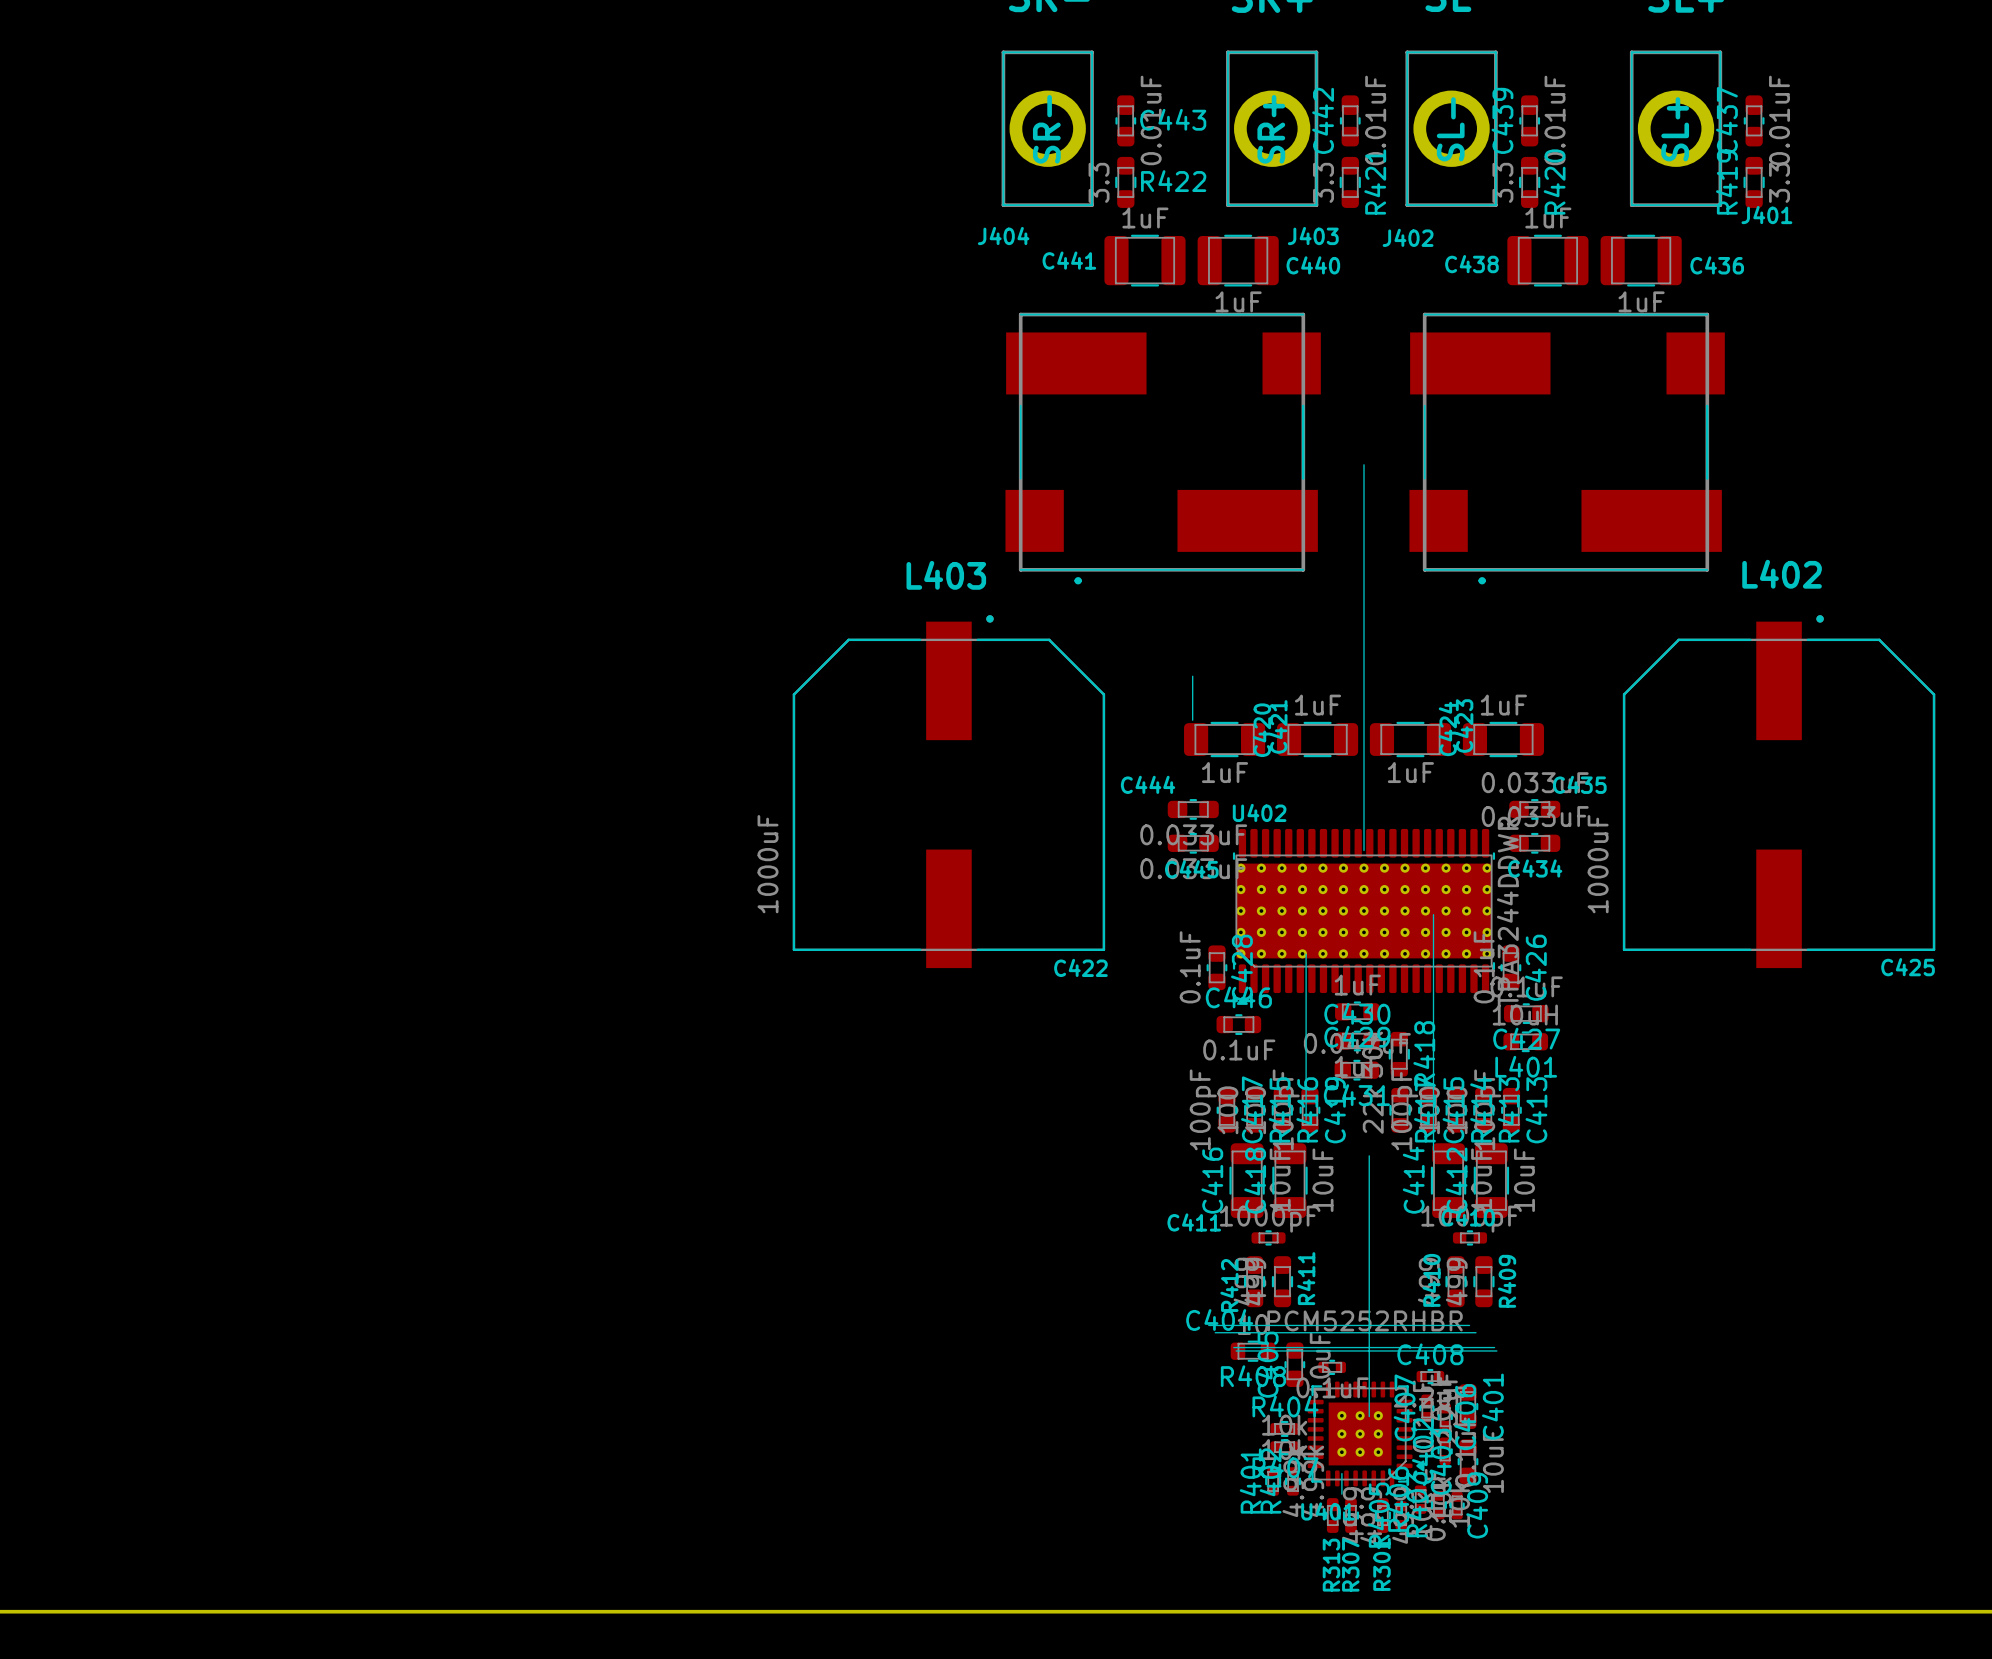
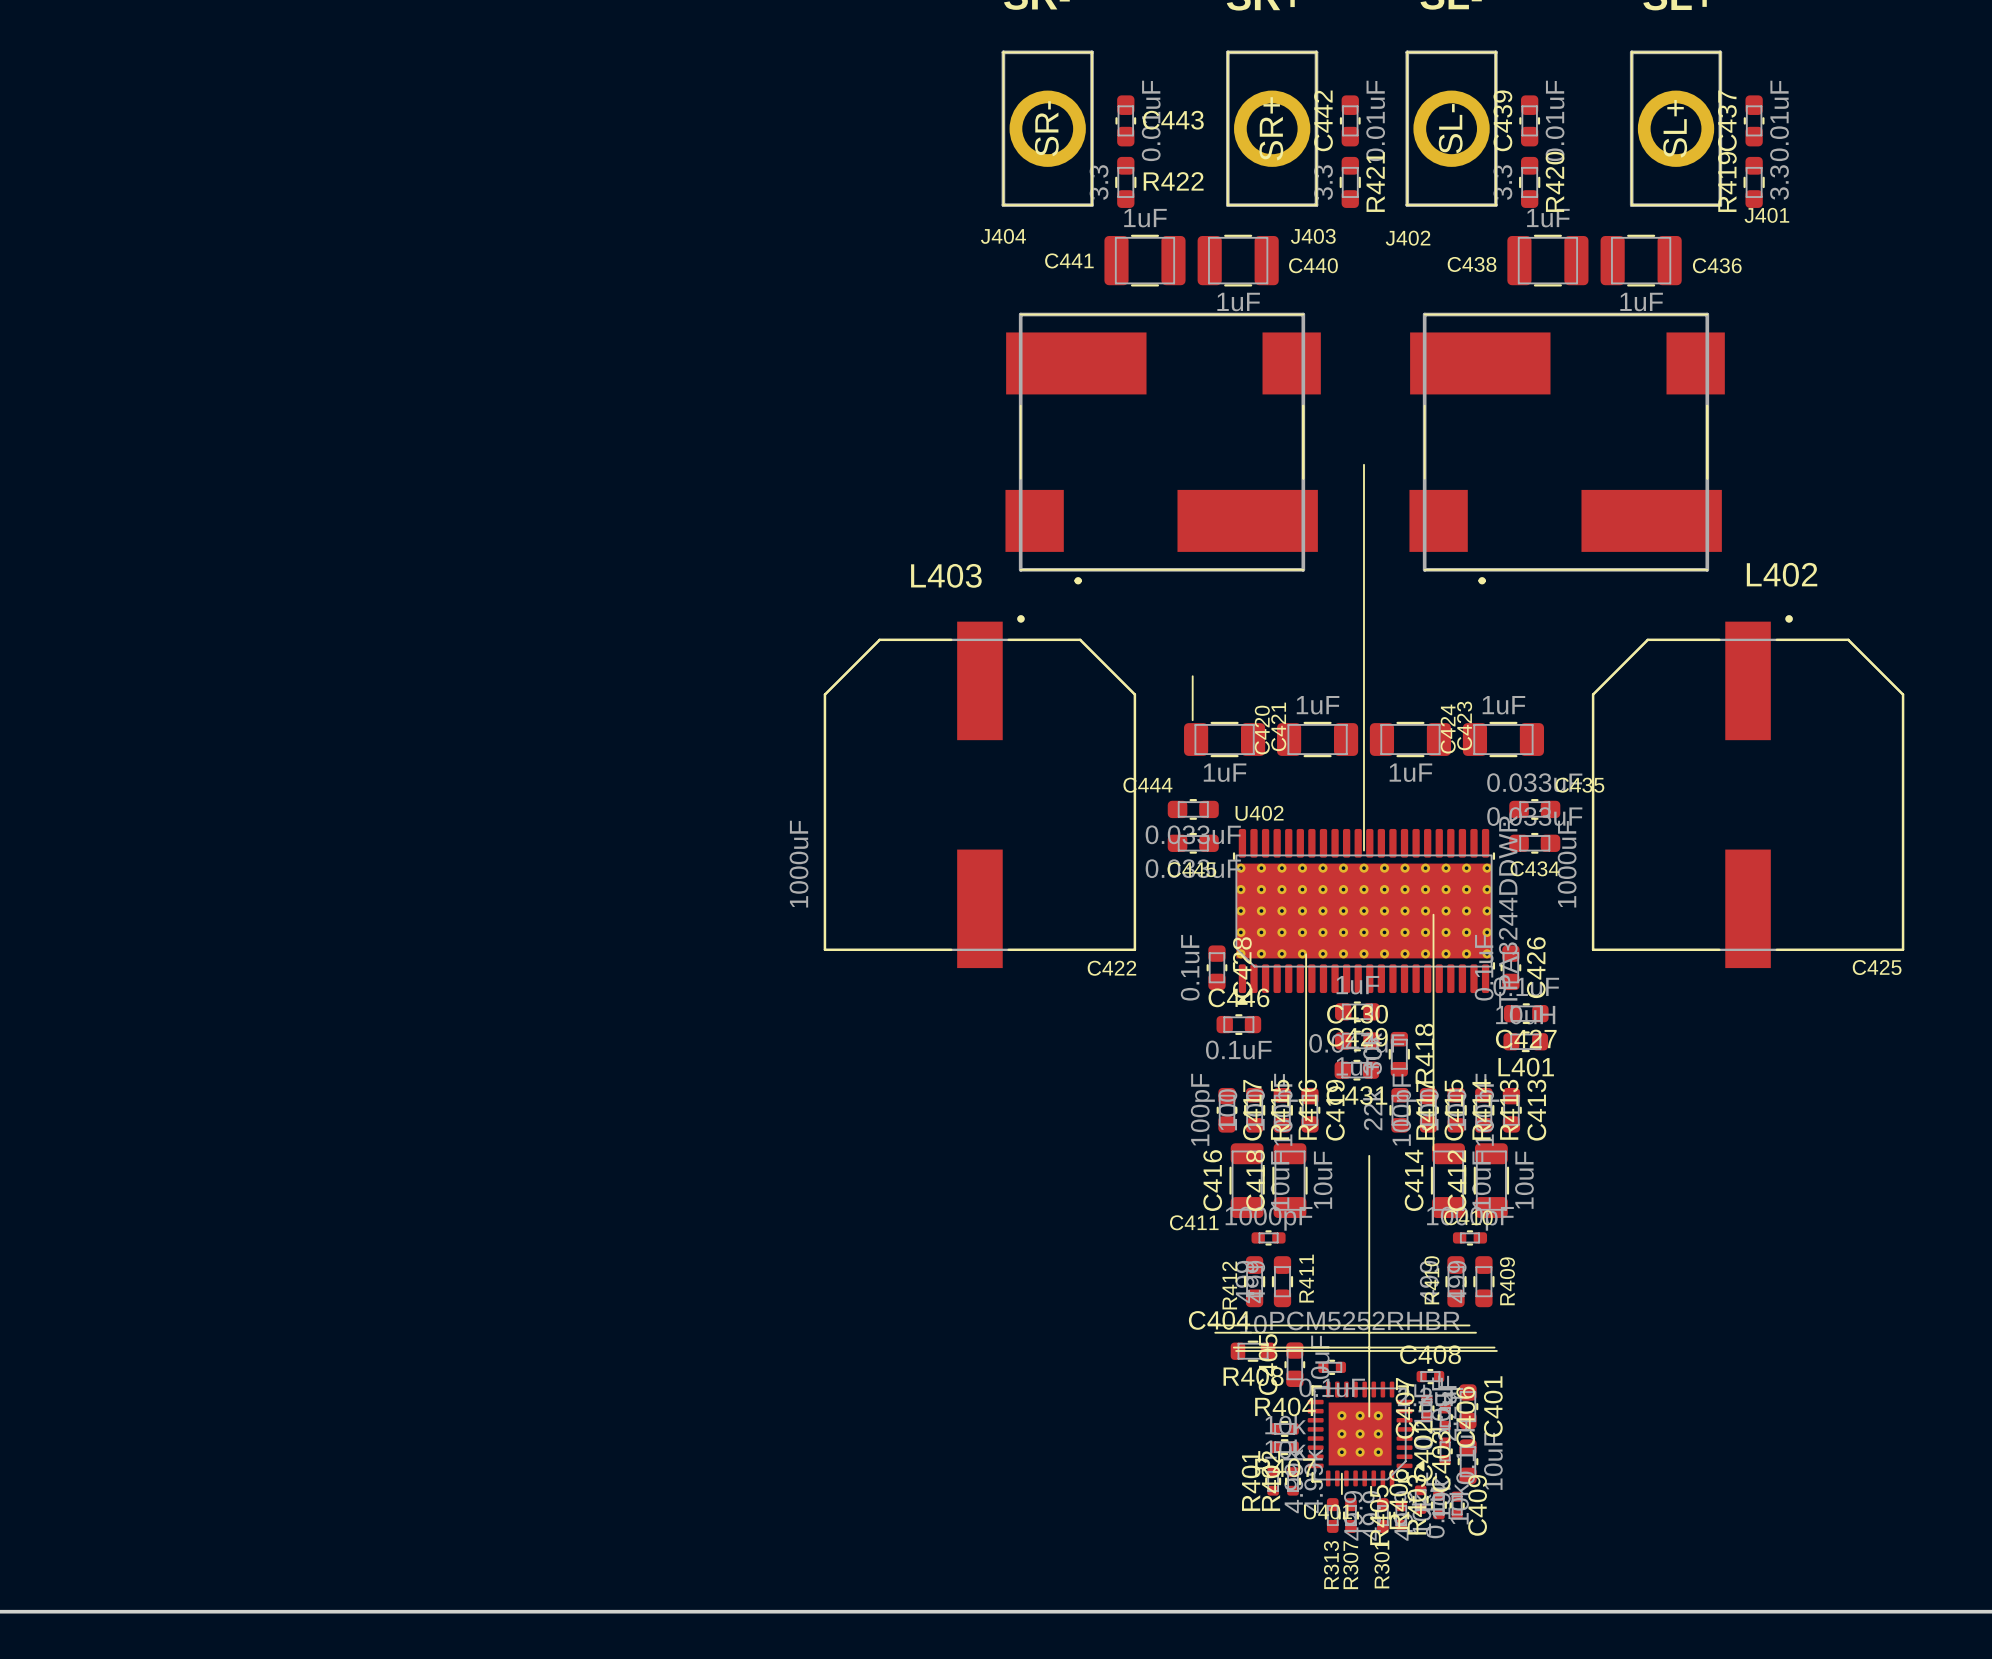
C422 position: (948, 791) -> (979, 791)
C425 position: (1779, 791) -> (1748, 791)

